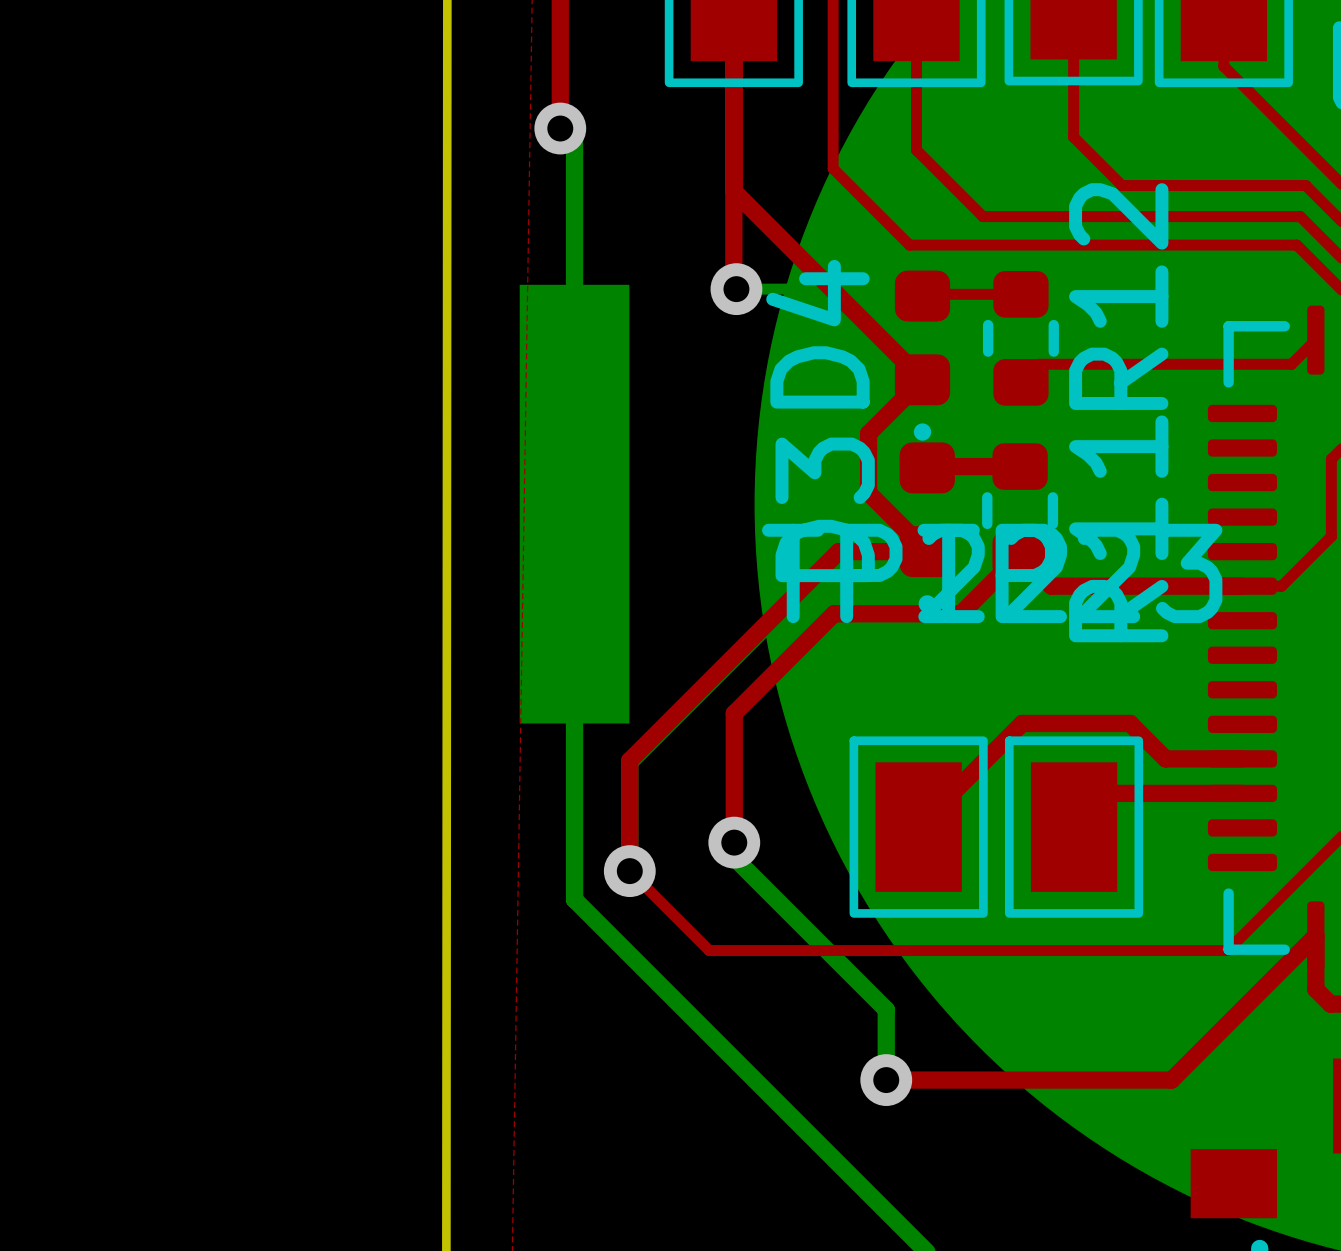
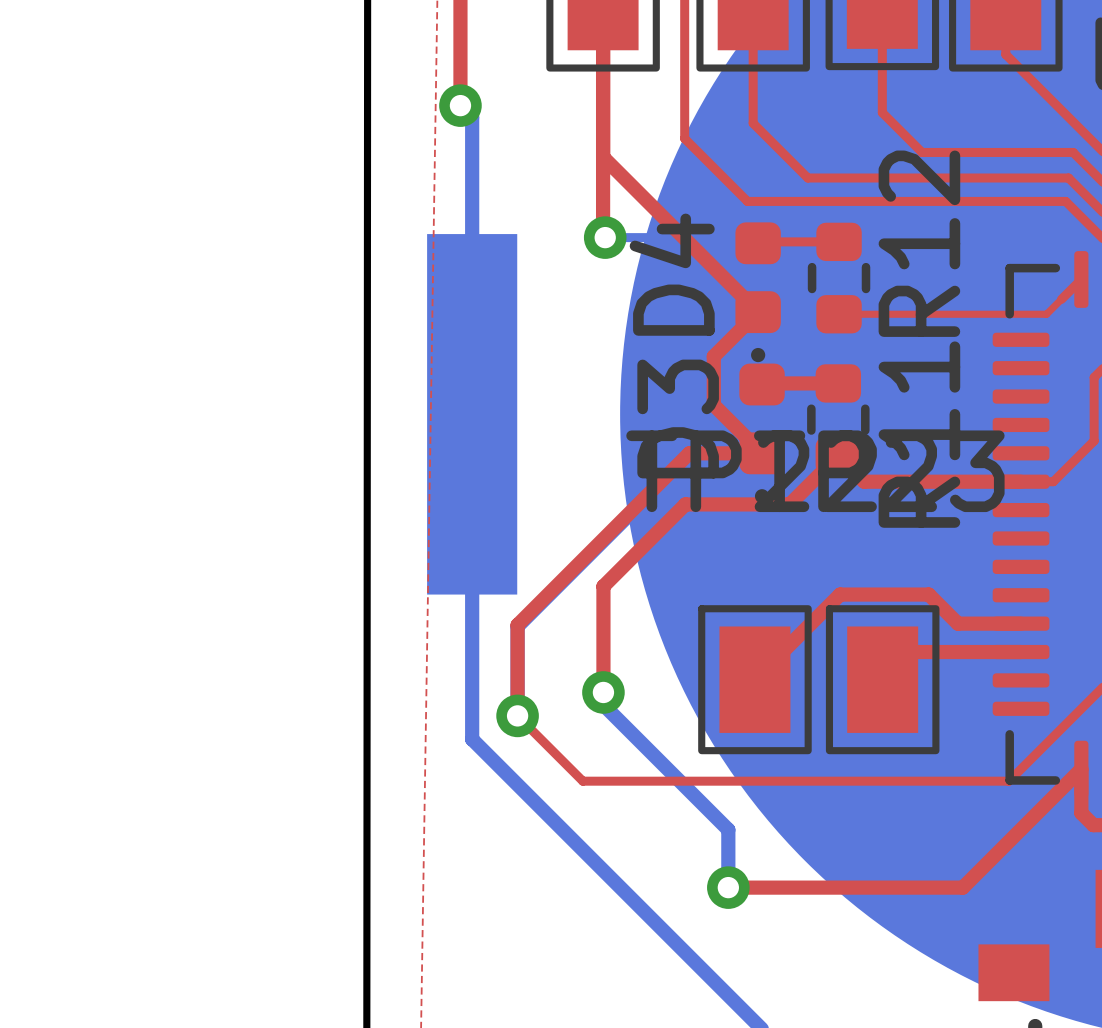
top track: (1291, 364) (1039, 364) (1020, 382) -> (1061, 299) (1046, 314) (839, 314)

